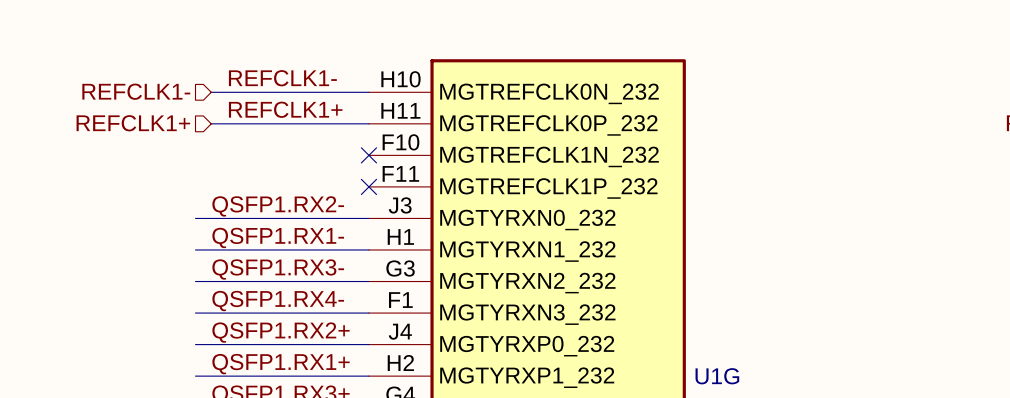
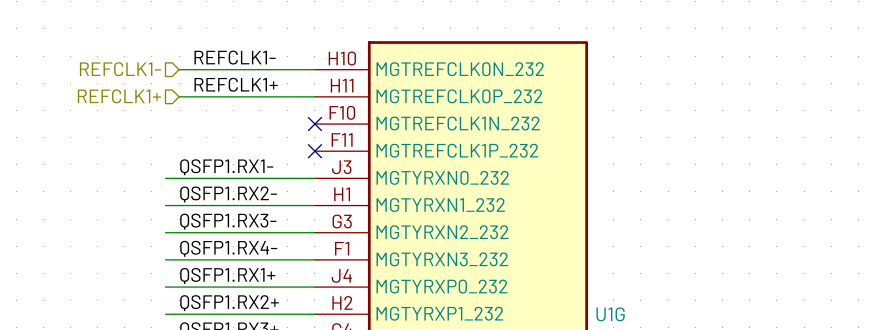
label: QSFP1.RX2- (278, 206) -> QSFP1.RX1- (226, 167)
label: QSFP1.RX1- (278, 237) -> QSFP1.RX2- (228, 194)
label: QSFP1.RX2+ (281, 332) -> QSFP1.RX1+ (227, 275)
label: QSFP1.RX1+ (281, 364) -> QSFP1.RX2+ (229, 303)

